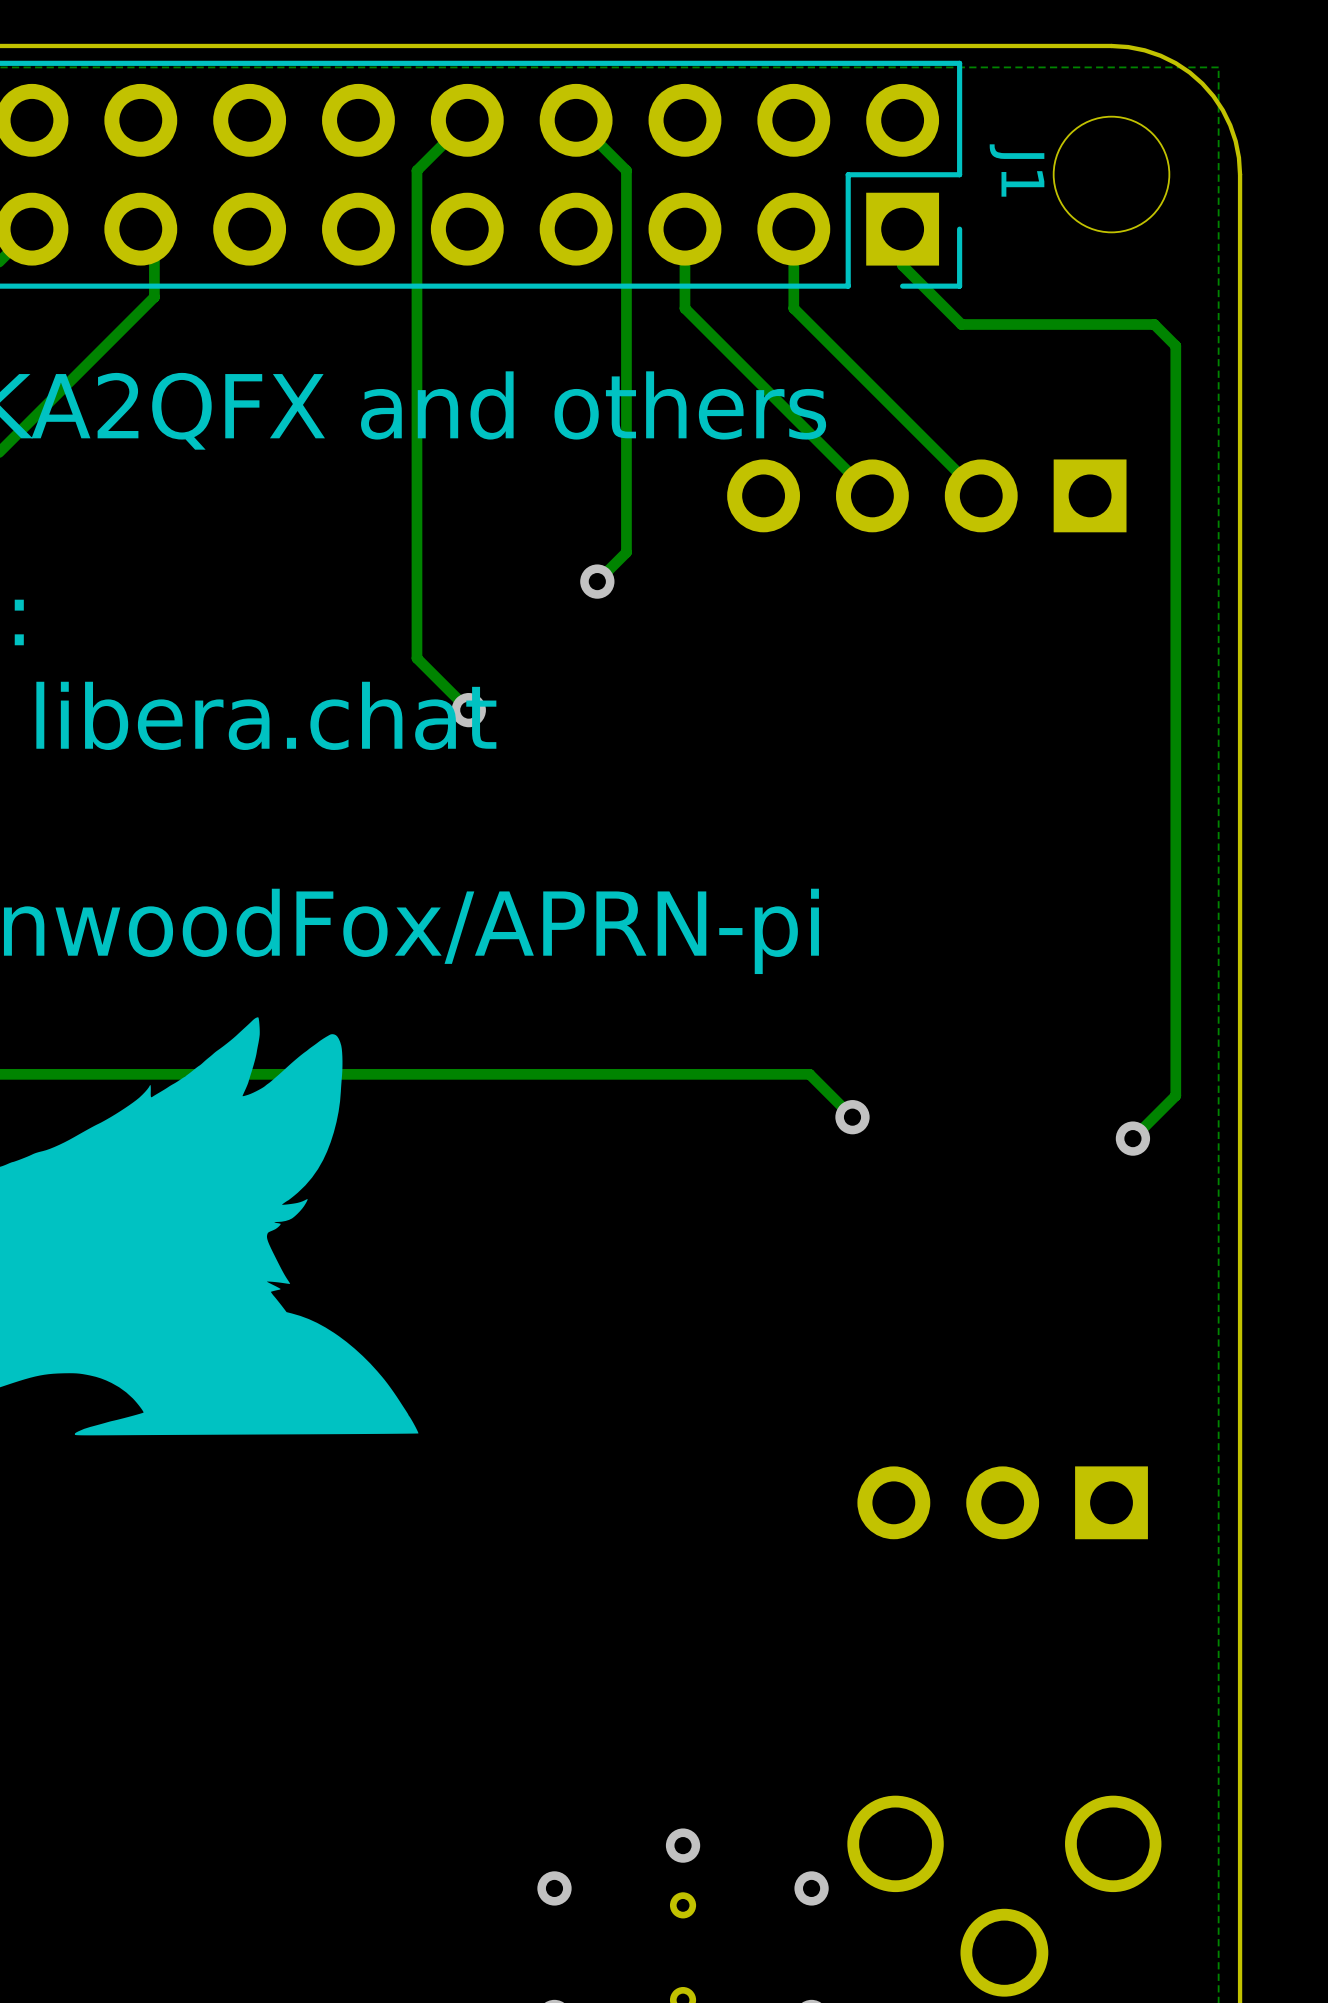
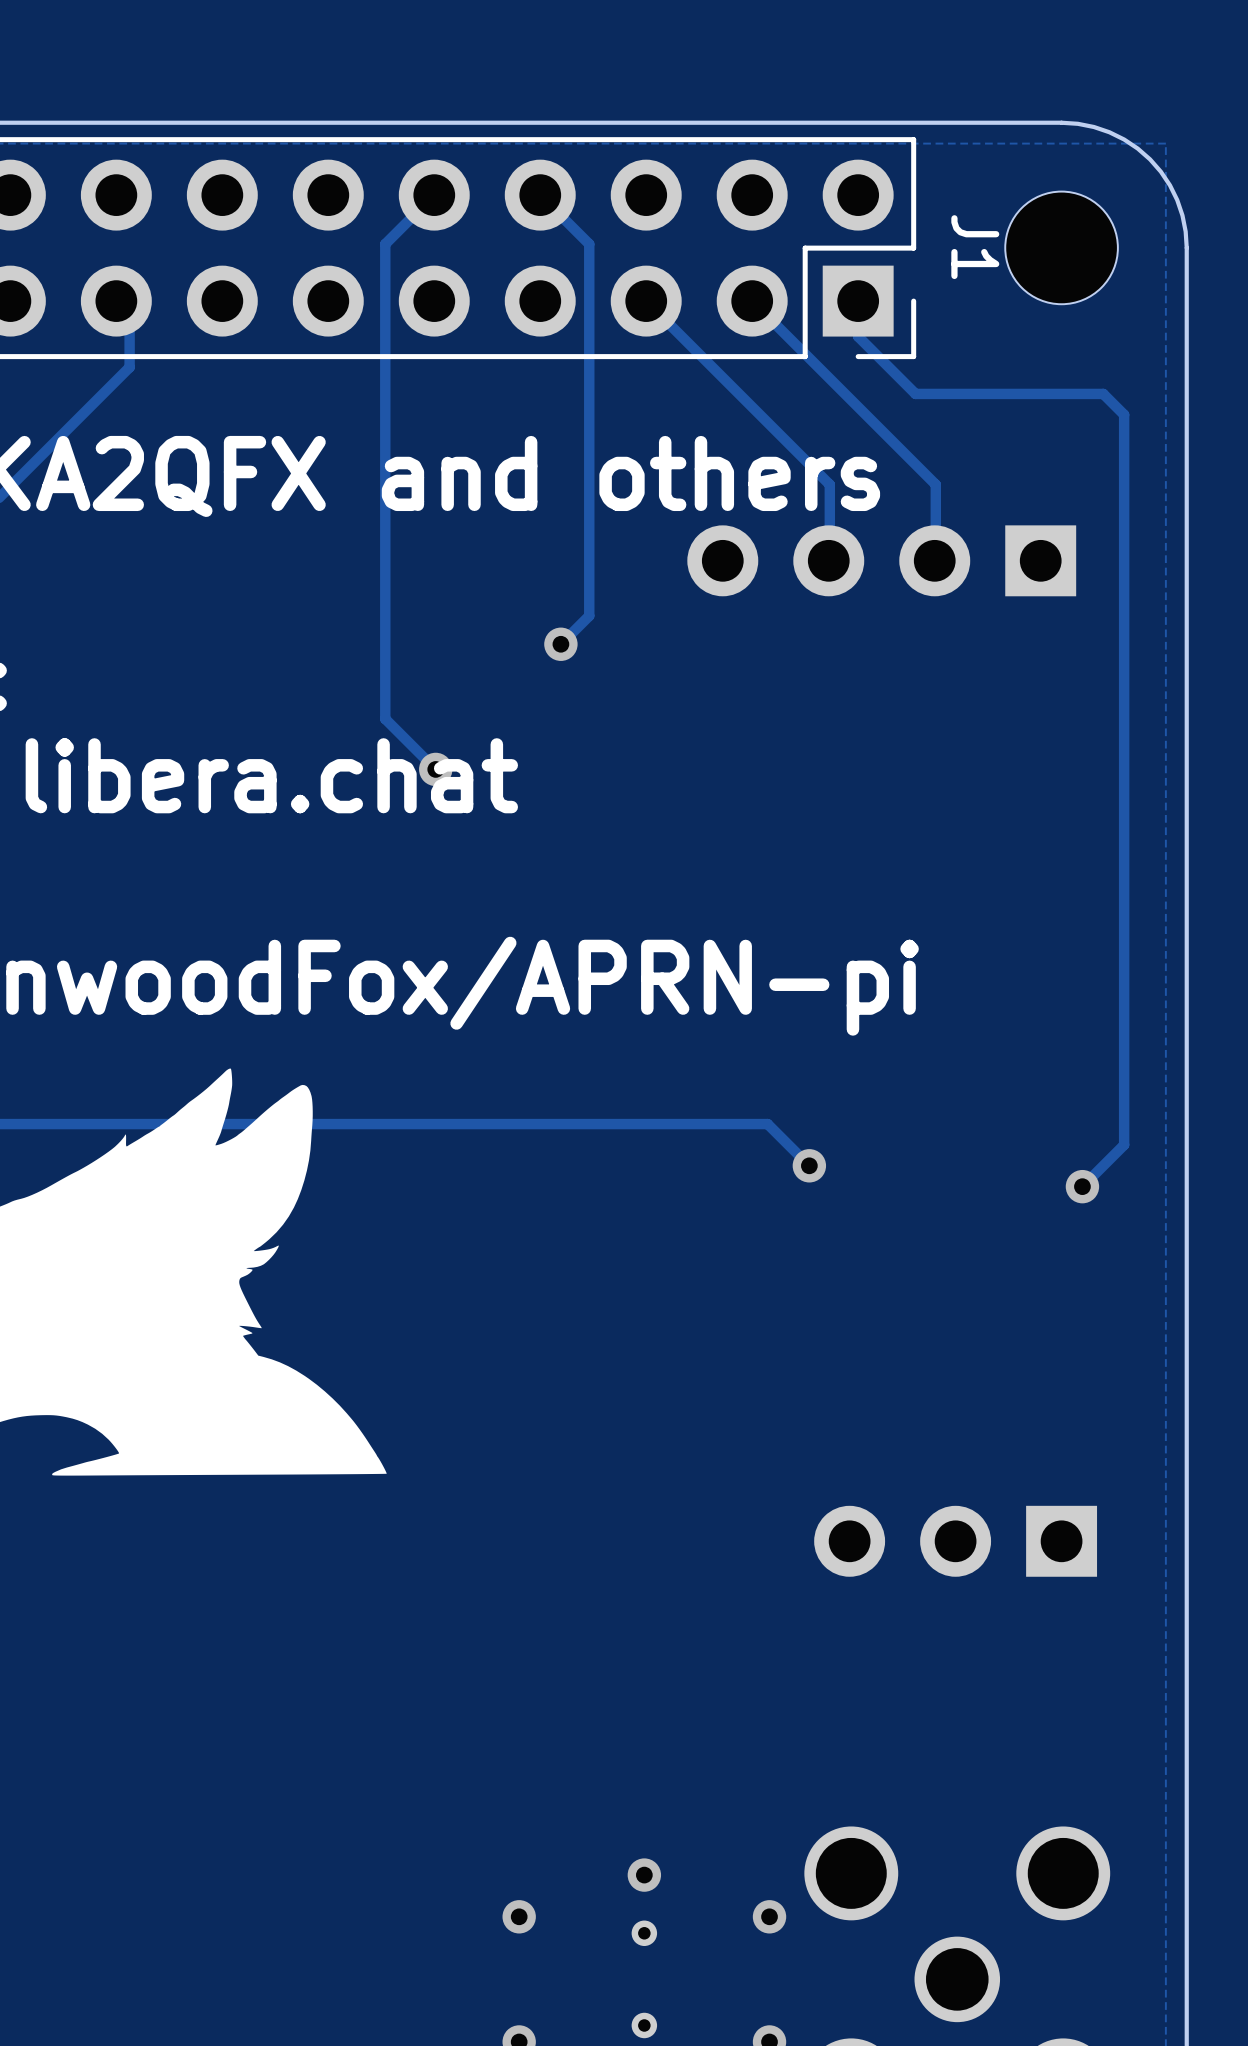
track: (684, 229) (684, 308) (872, 495) -> (646, 301) (829, 484) (829, 560)
track: (793, 229) (793, 308) (981, 495) -> (752, 301) (935, 484) (935, 560)

